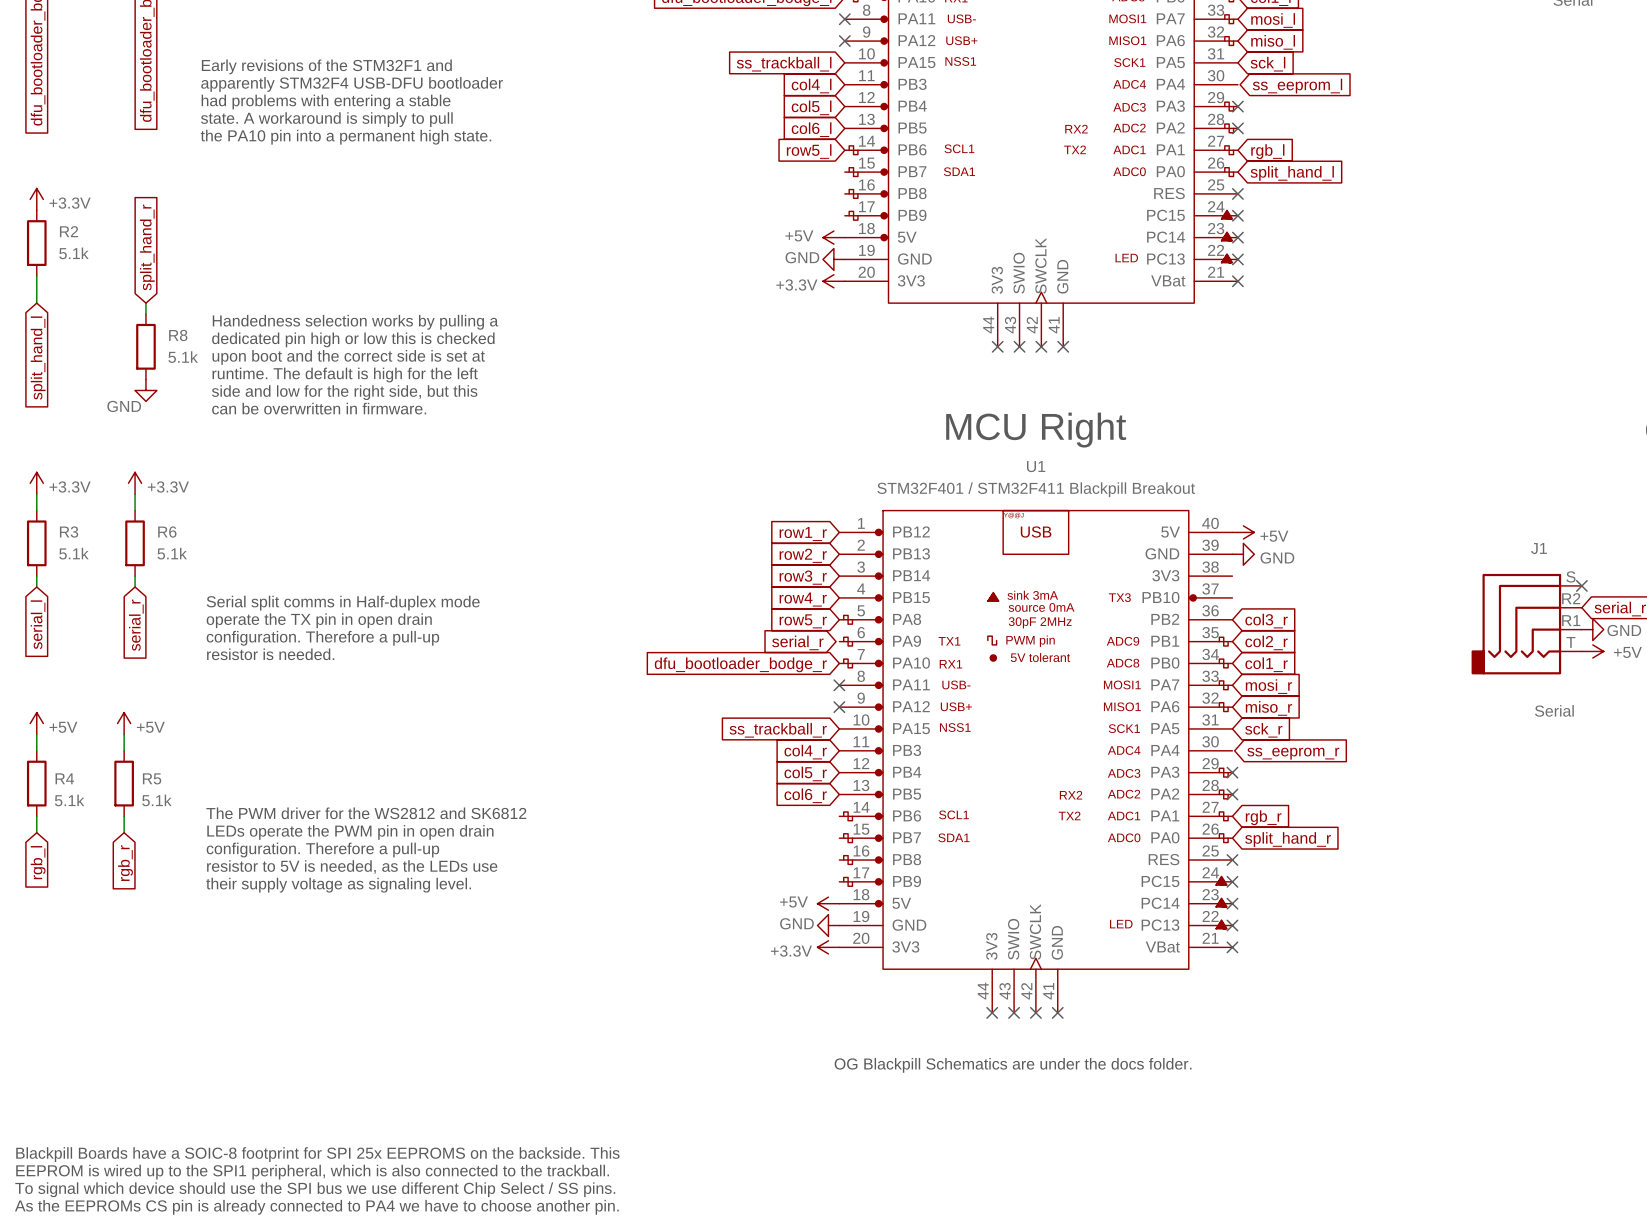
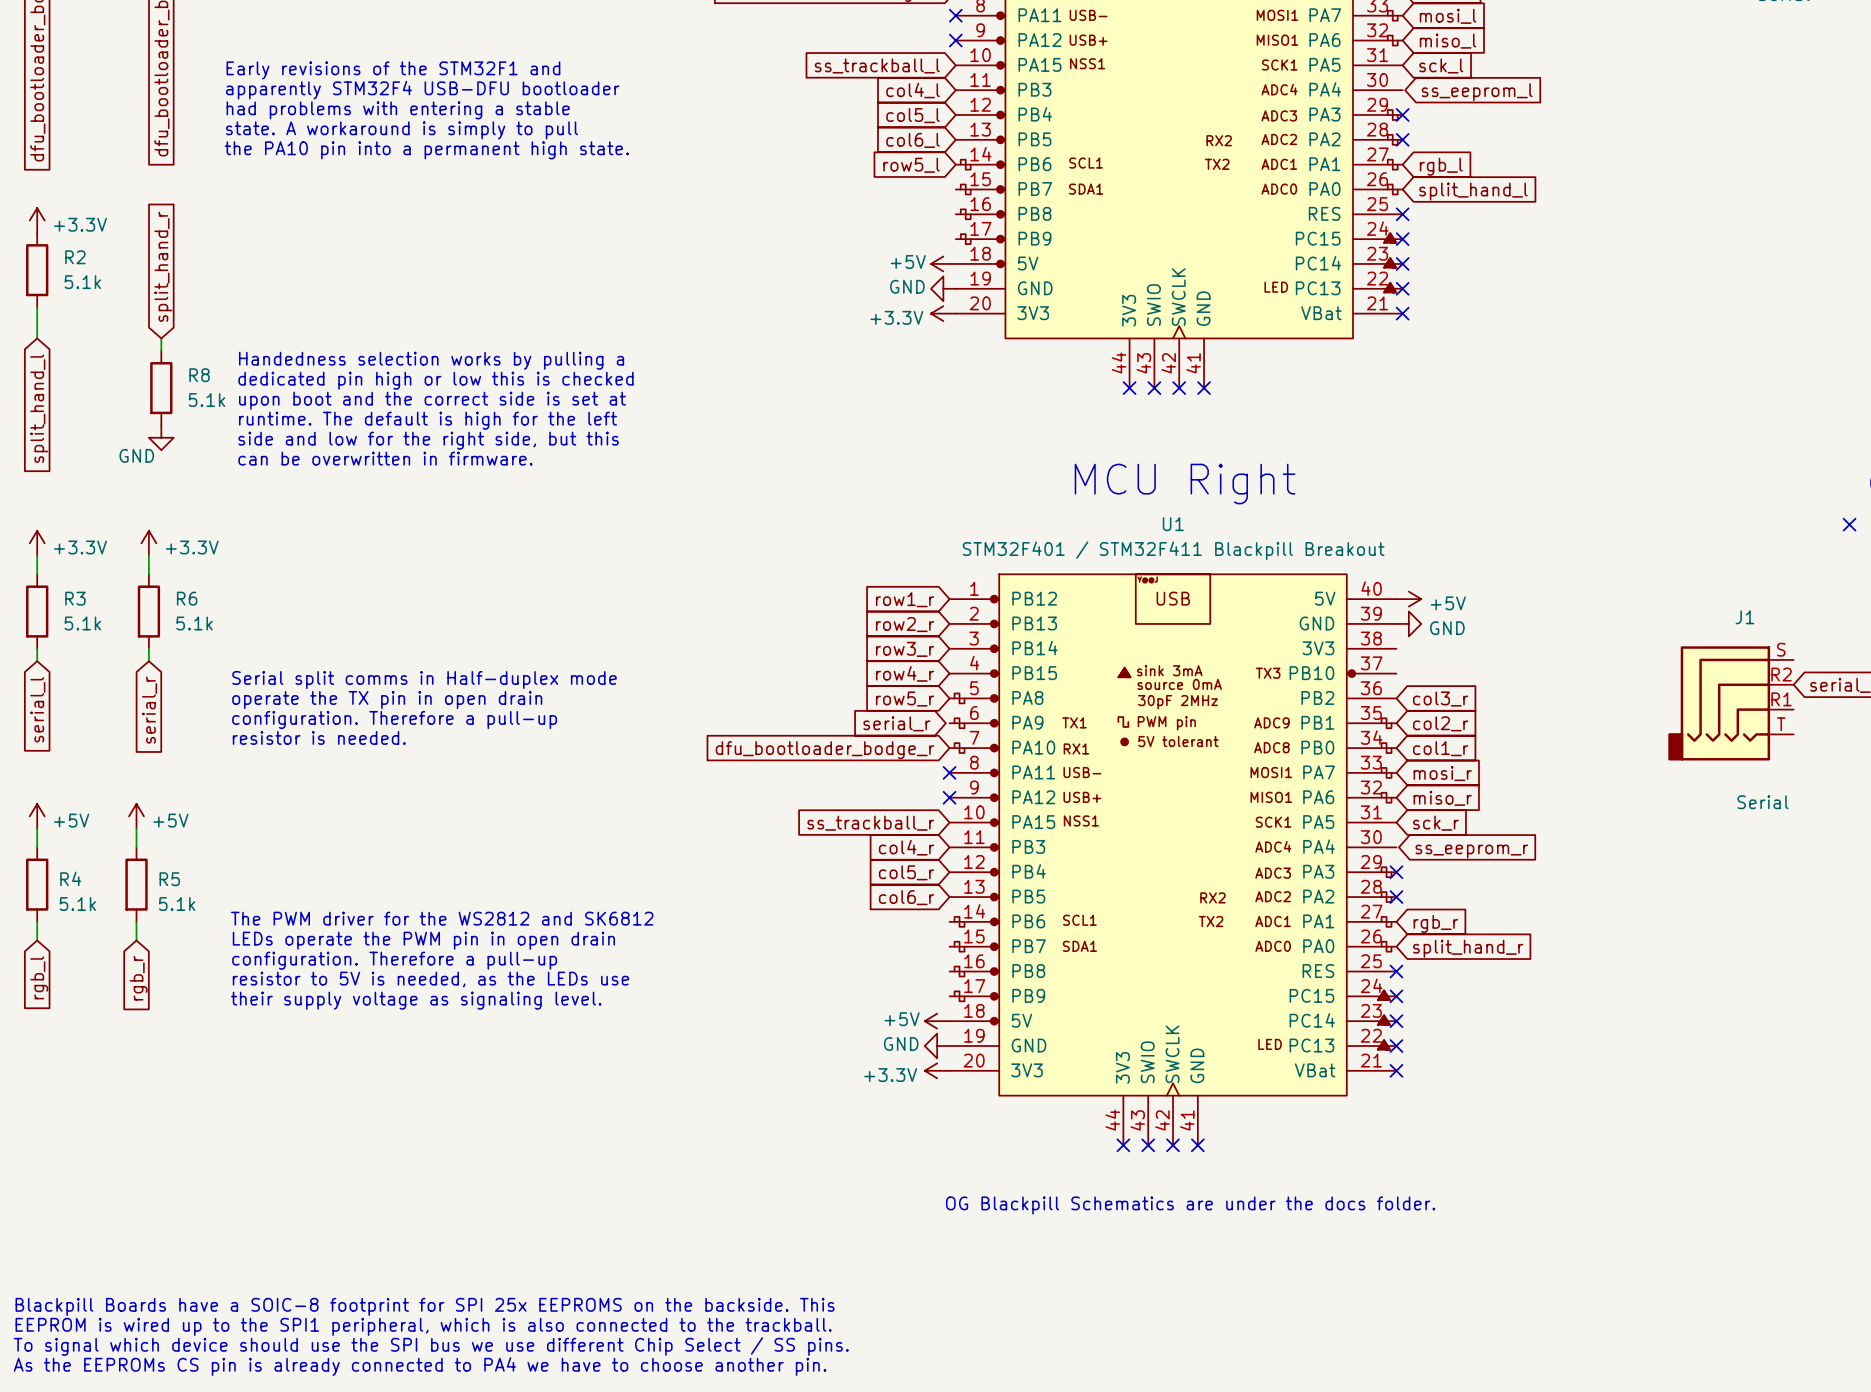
no-connect mark: none -> (1849, 524)
no-connect mark: (1581, 585) -> none
power symbol: GND (1592, 629) -> none
power symbol: +5V (1592, 651) -> none

